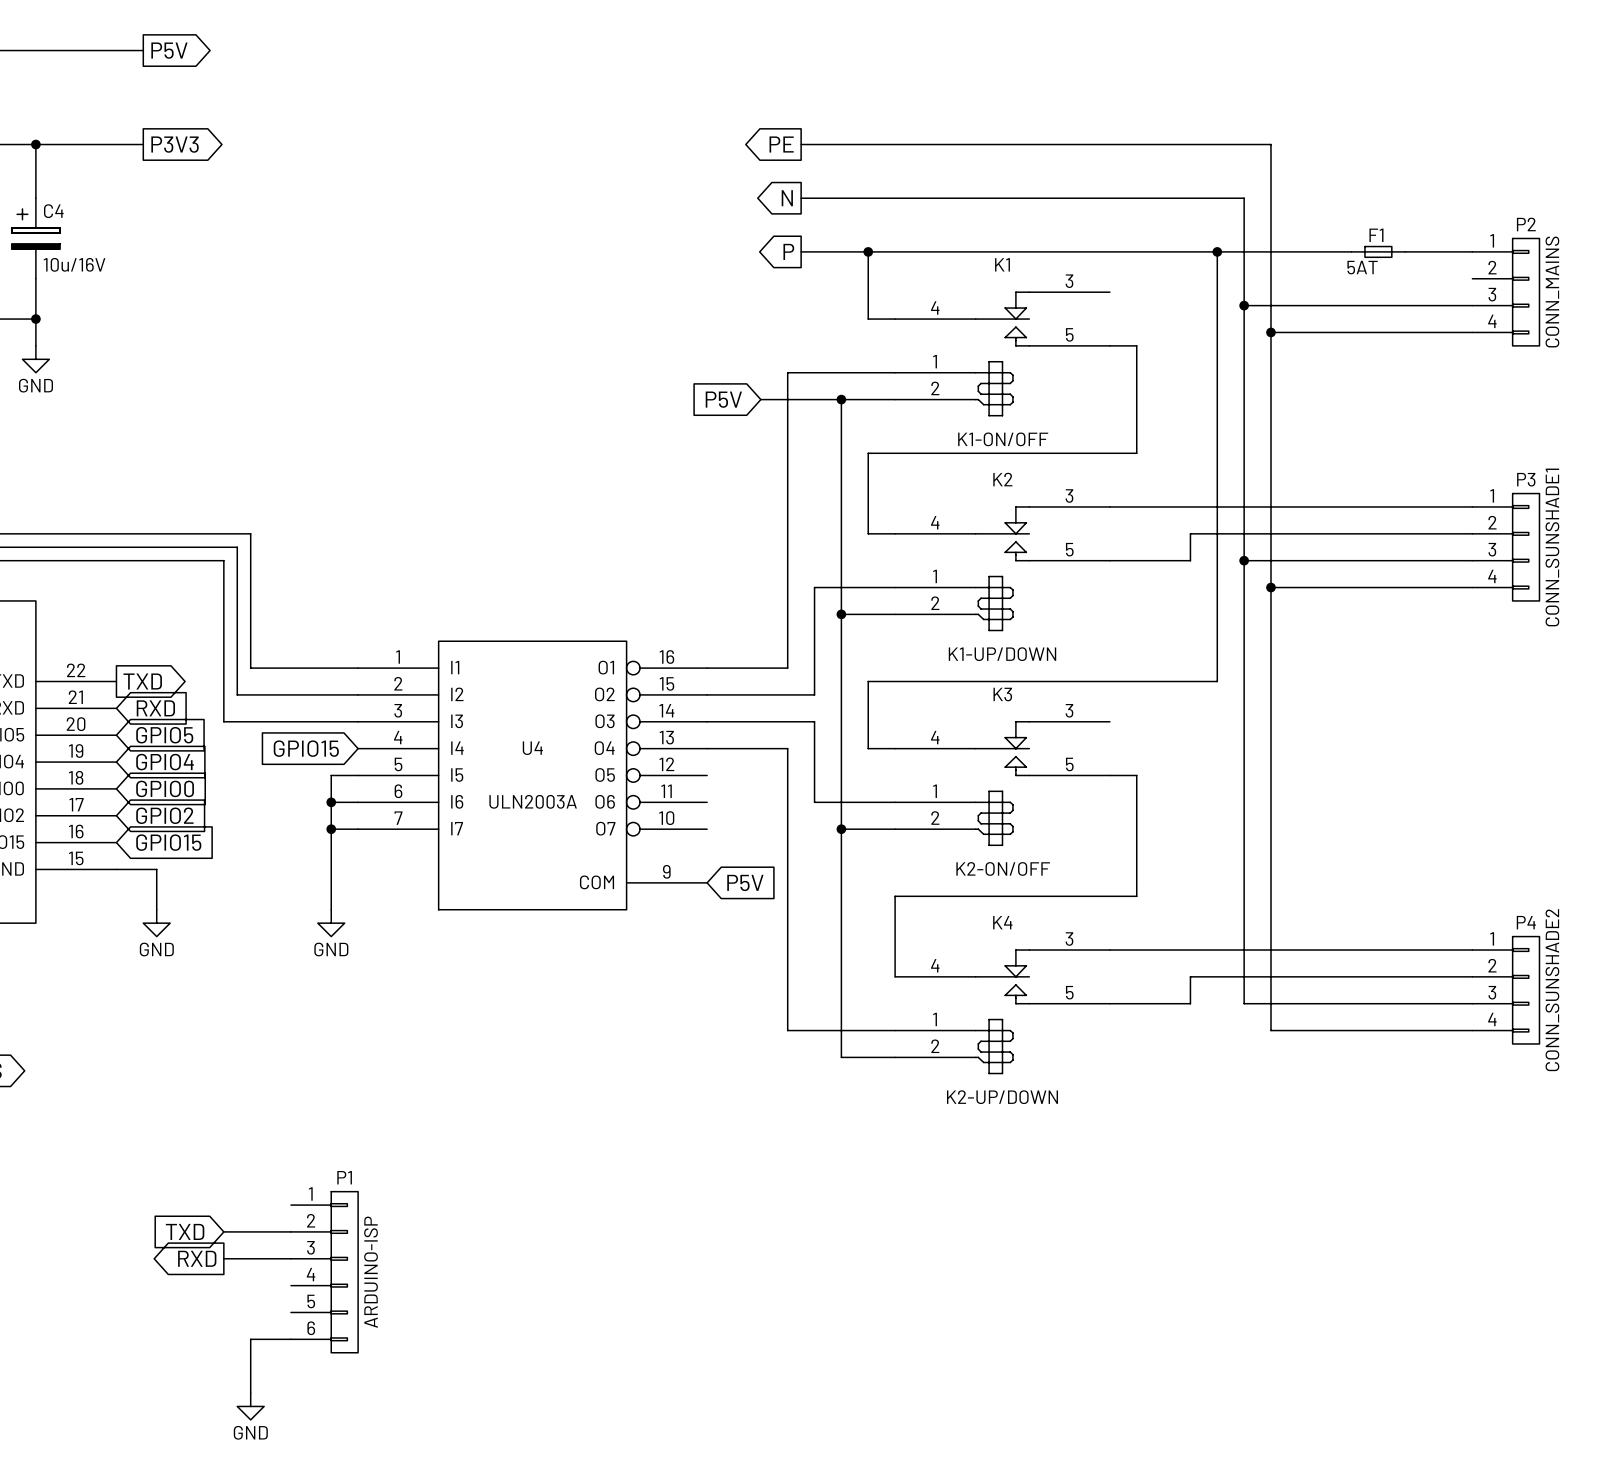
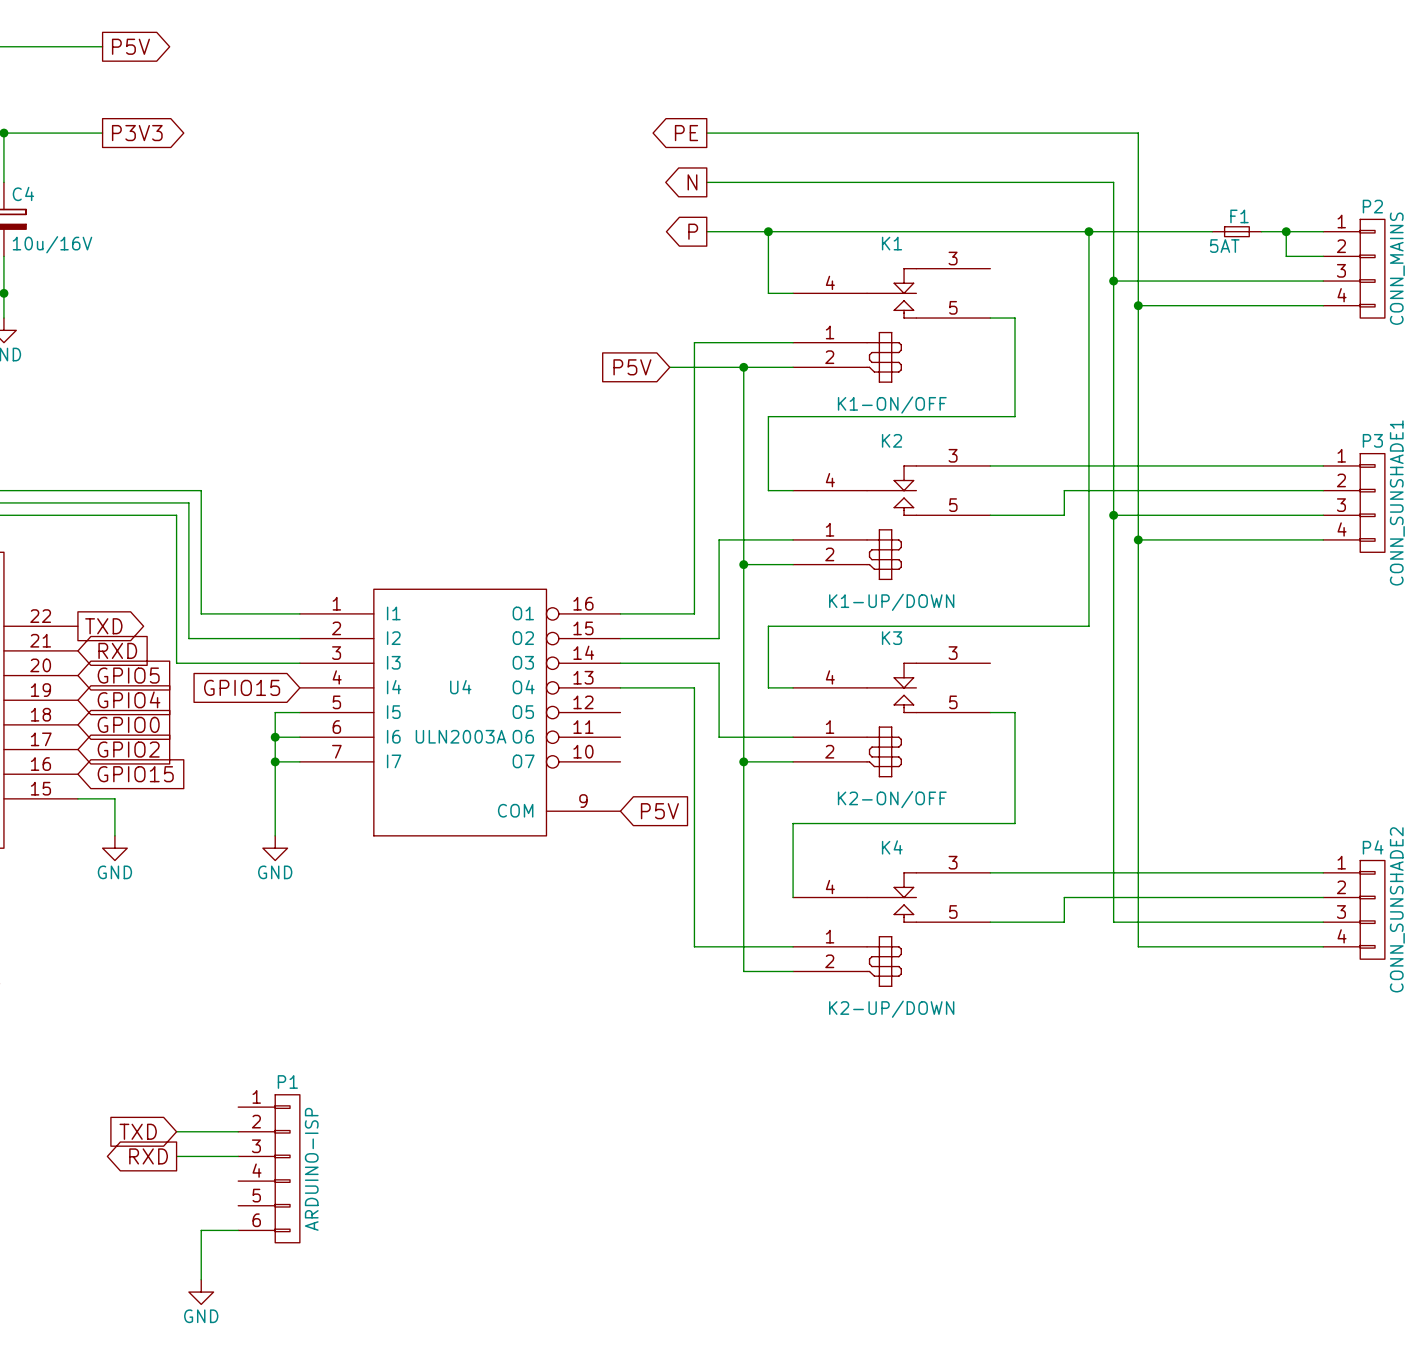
wire: none -> (1286, 231) (1286, 256) (1323, 256)
junction: none -> (1286, 231)

